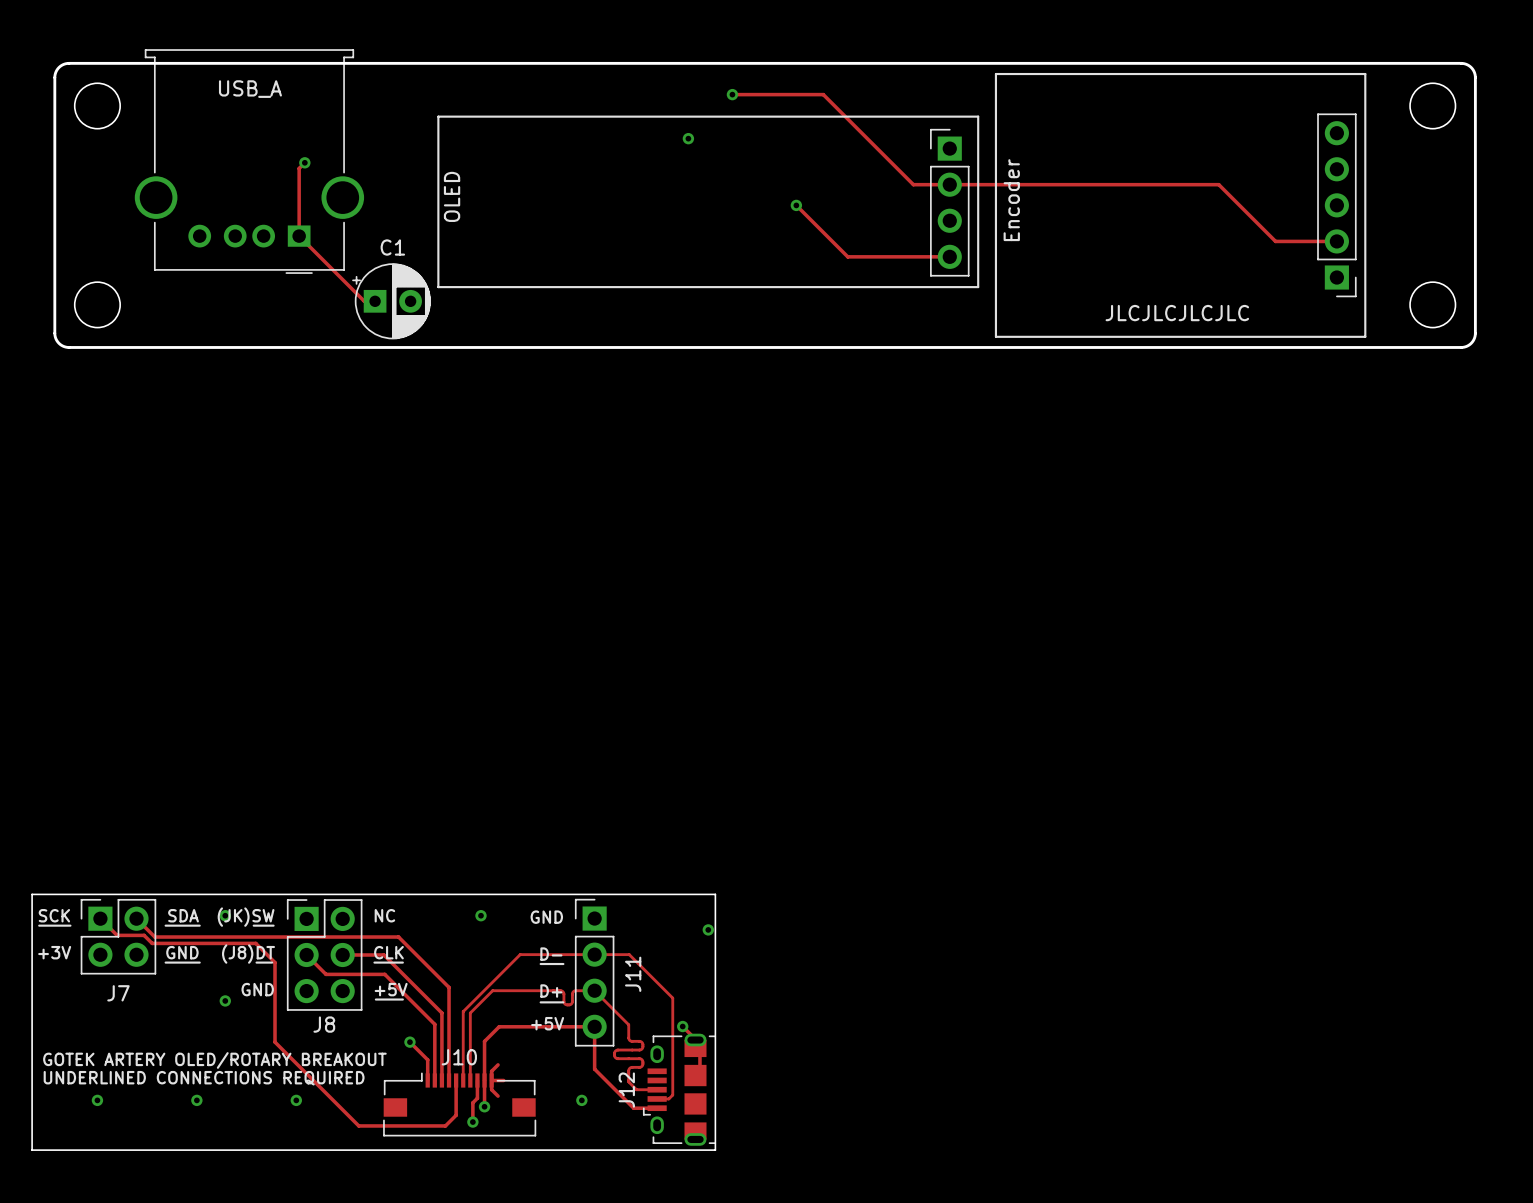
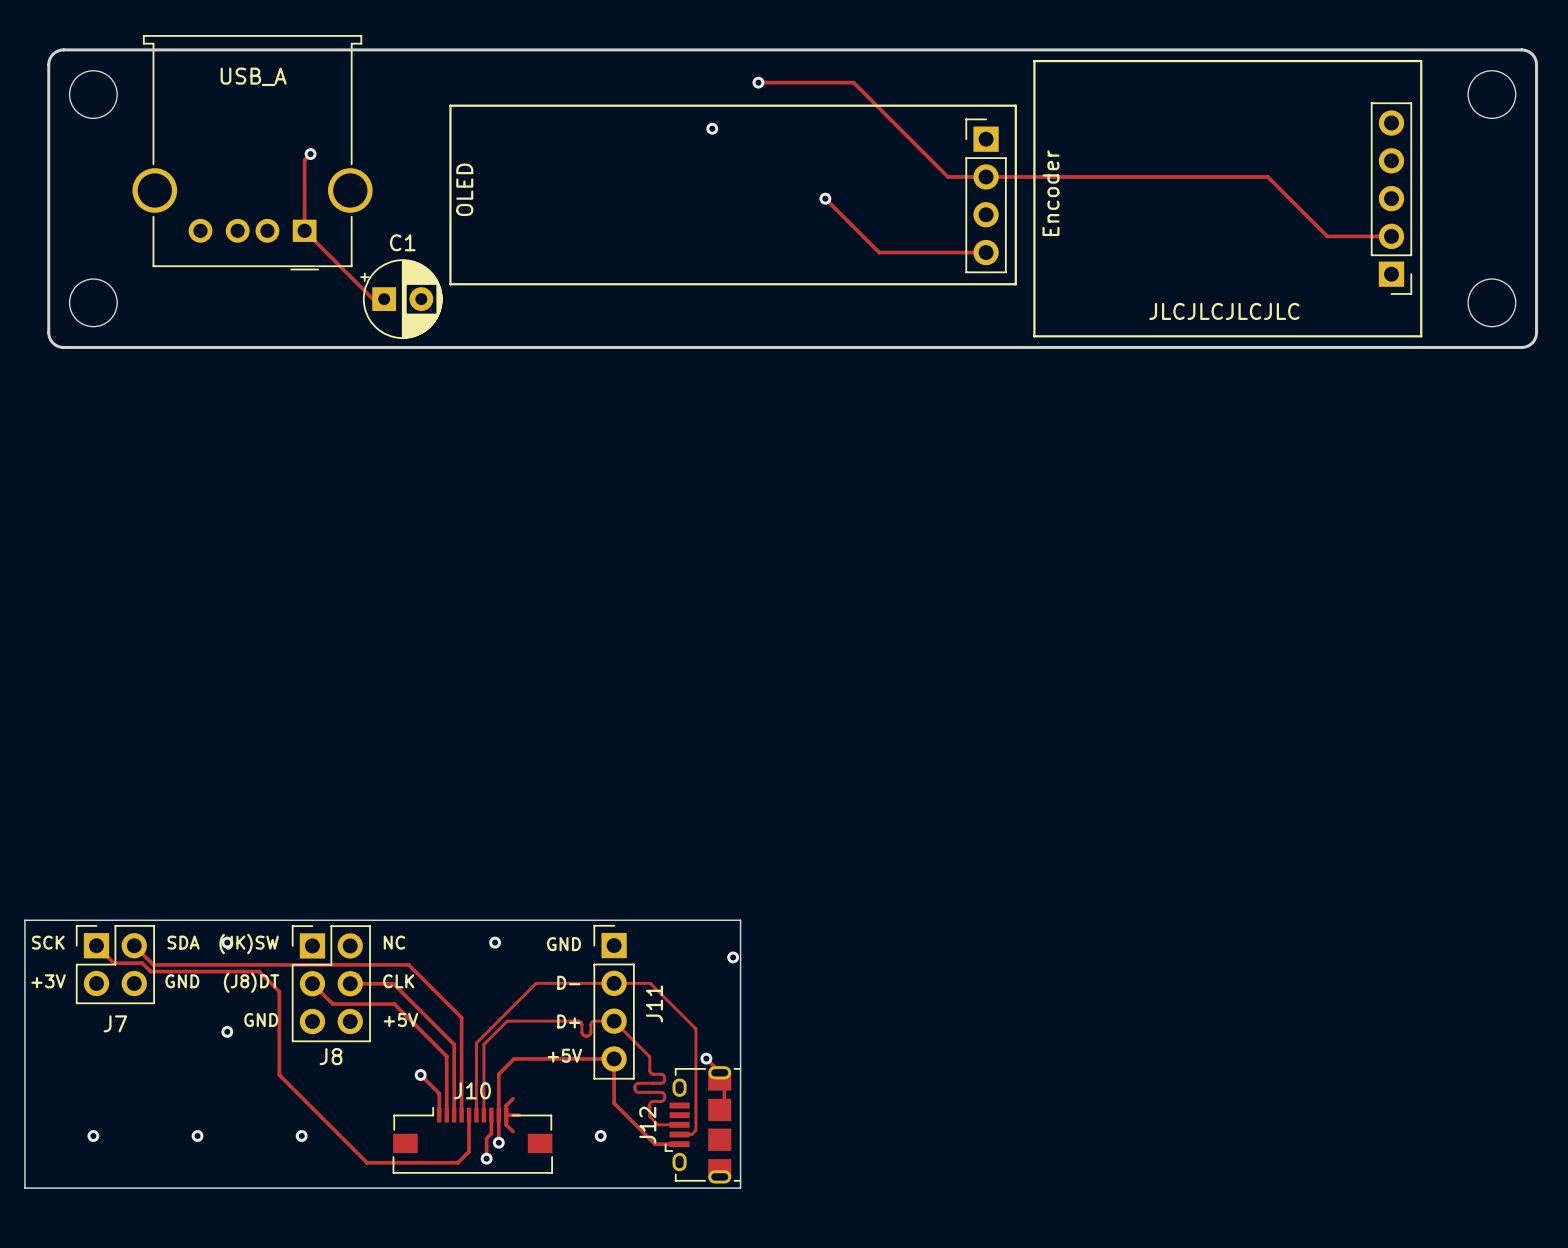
line: (39, 925) (70, 925) -> none
line: (165, 925) (199, 925) -> none
line: (253, 925) (273, 925) -> none
line: (165, 962) (199, 962) -> none
line: (256, 962) (272, 962) -> none
line: (374, 962) (402, 962) -> none
line: (540, 964) (563, 964) -> none
line: (375, 999) (402, 999) -> none
line: (540, 1002) (563, 1002) -> none
text: GOTEK ARTERY OLED/ROTARY BREAKOUT (214, 1060) -> none
text: UNDERLINED CONNECTIONS REQUIRED (204, 1078) -> none

